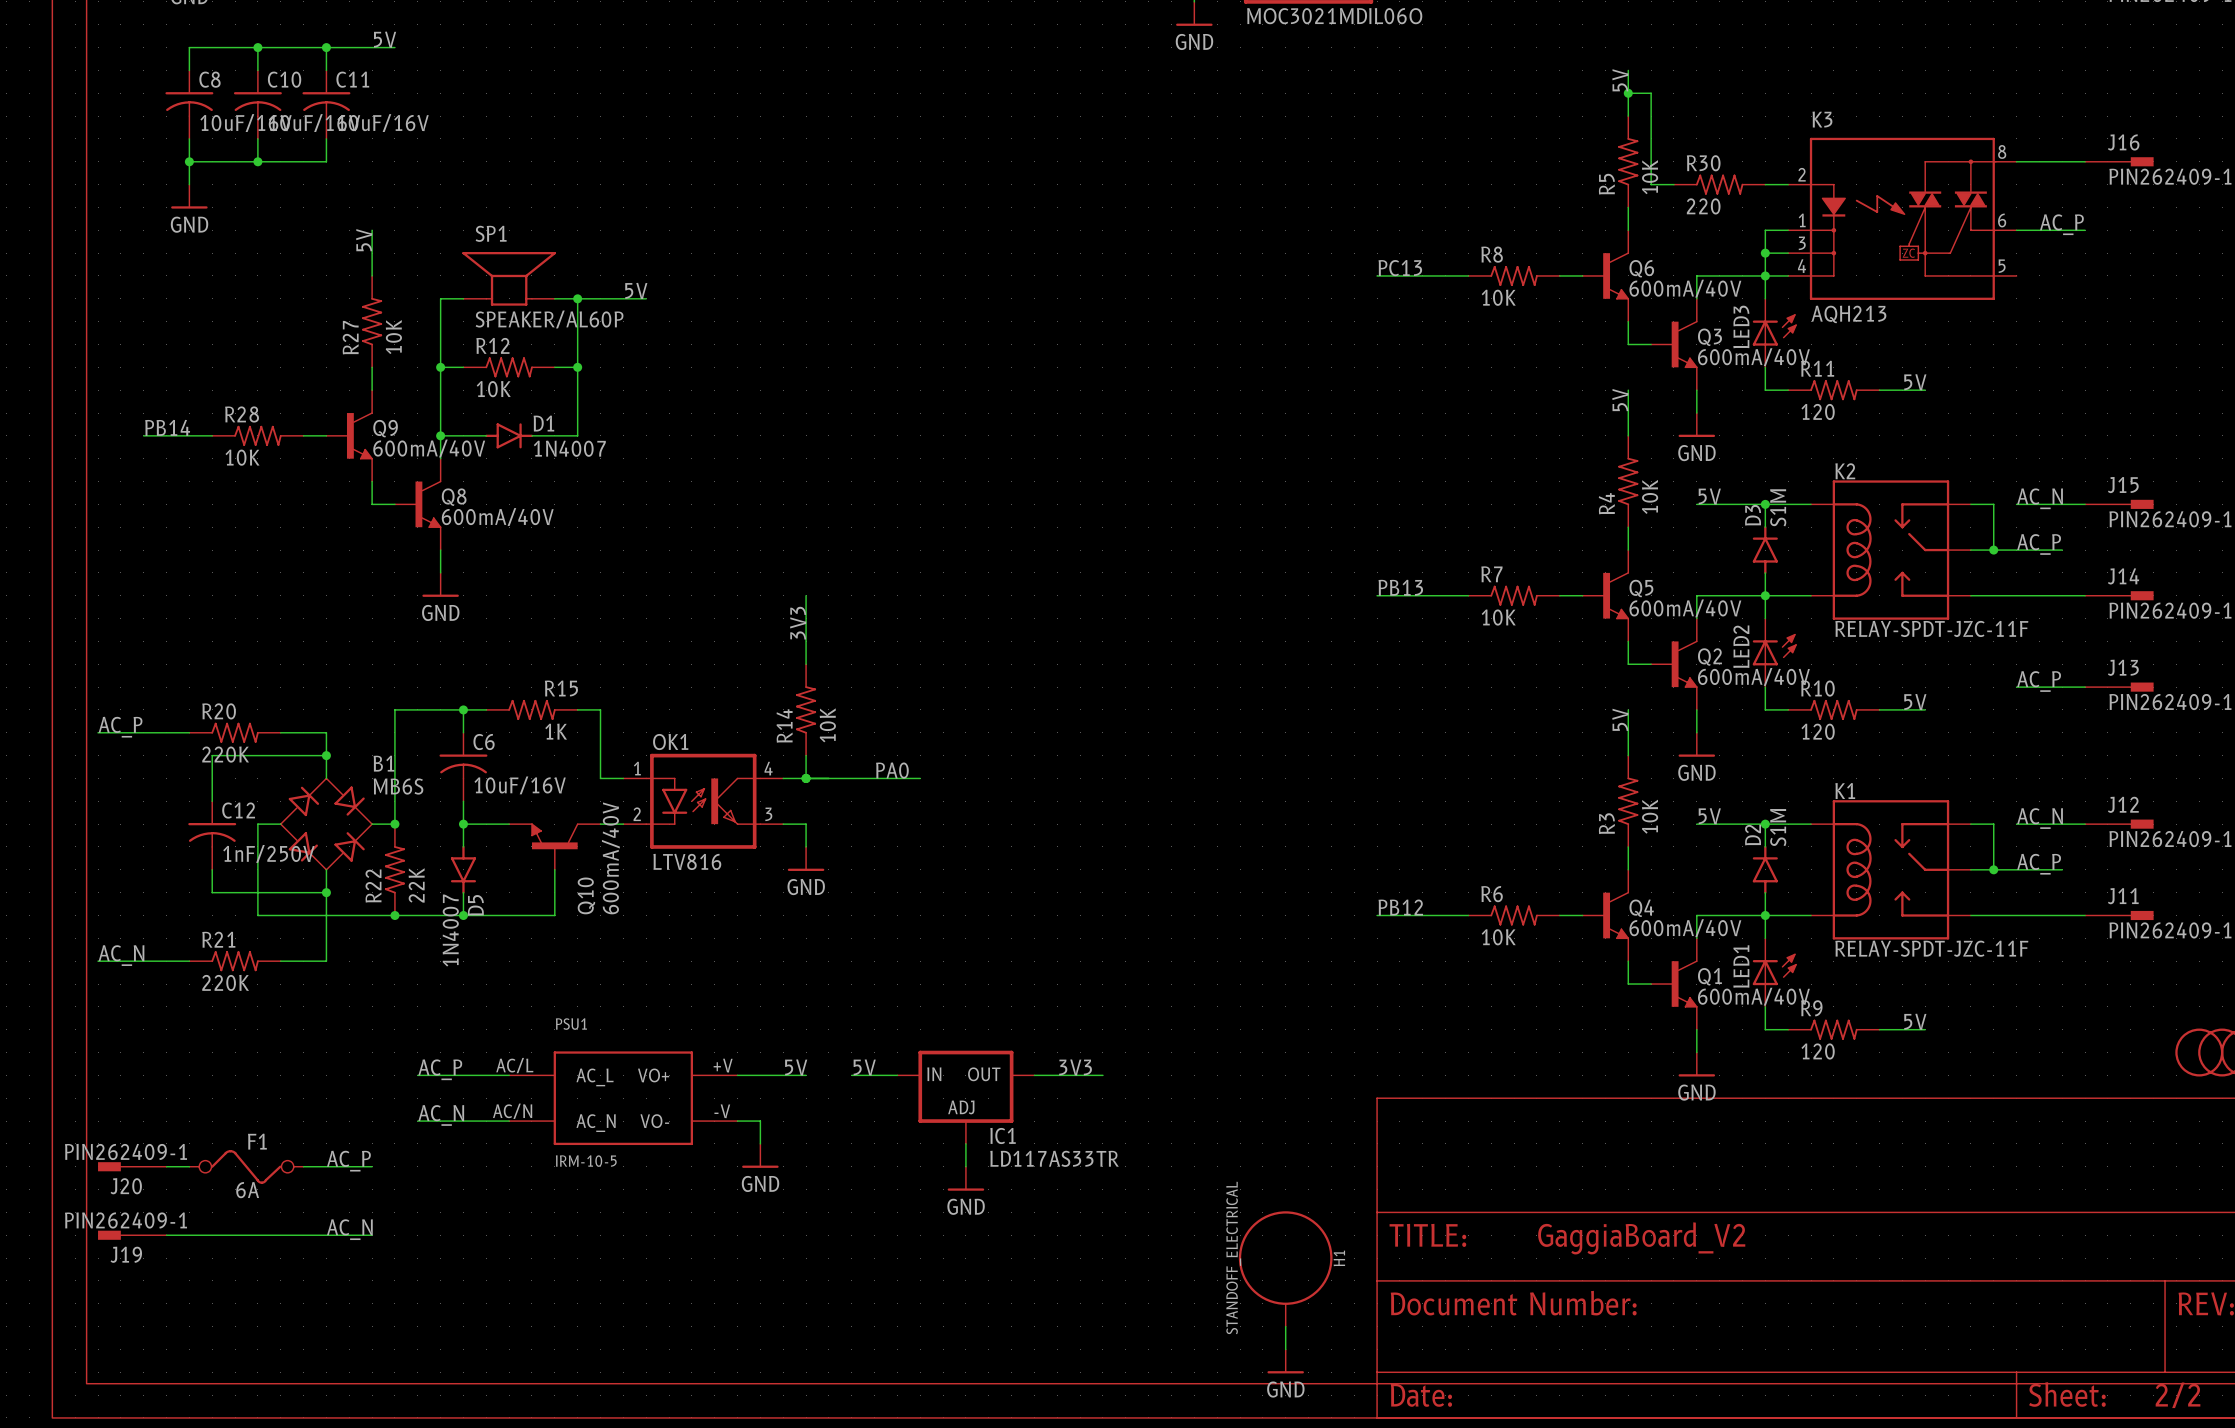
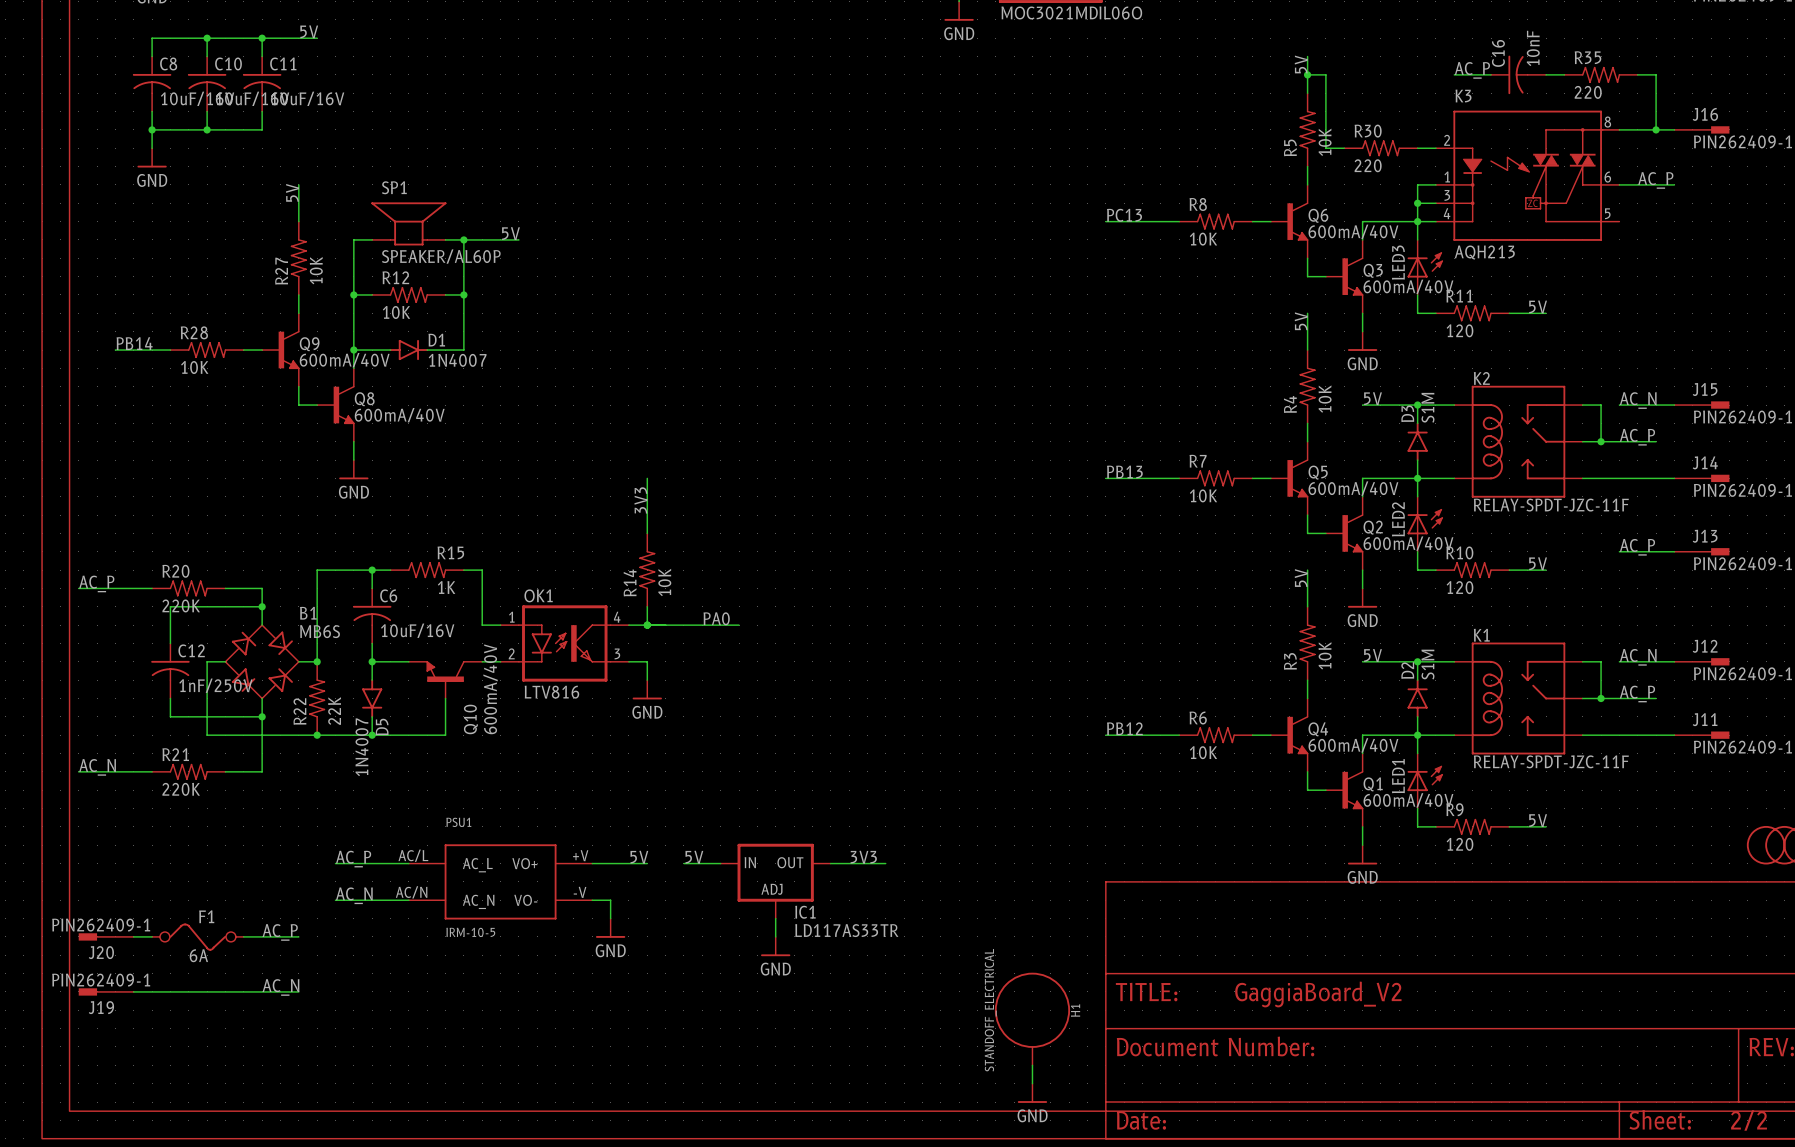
label: none -> AC_P (1472, 70)
wire: none -> (1454, 74) (1491, 74)
C16: none -> 10nF (1518, 74)
wire: none -> (1546, 74) (1564, 74)
R35: none -> 220 (1601, 74)
wire: none -> (1637, 74) (1656, 74) (1656, 129)
junction: none -> (1656, 129)

